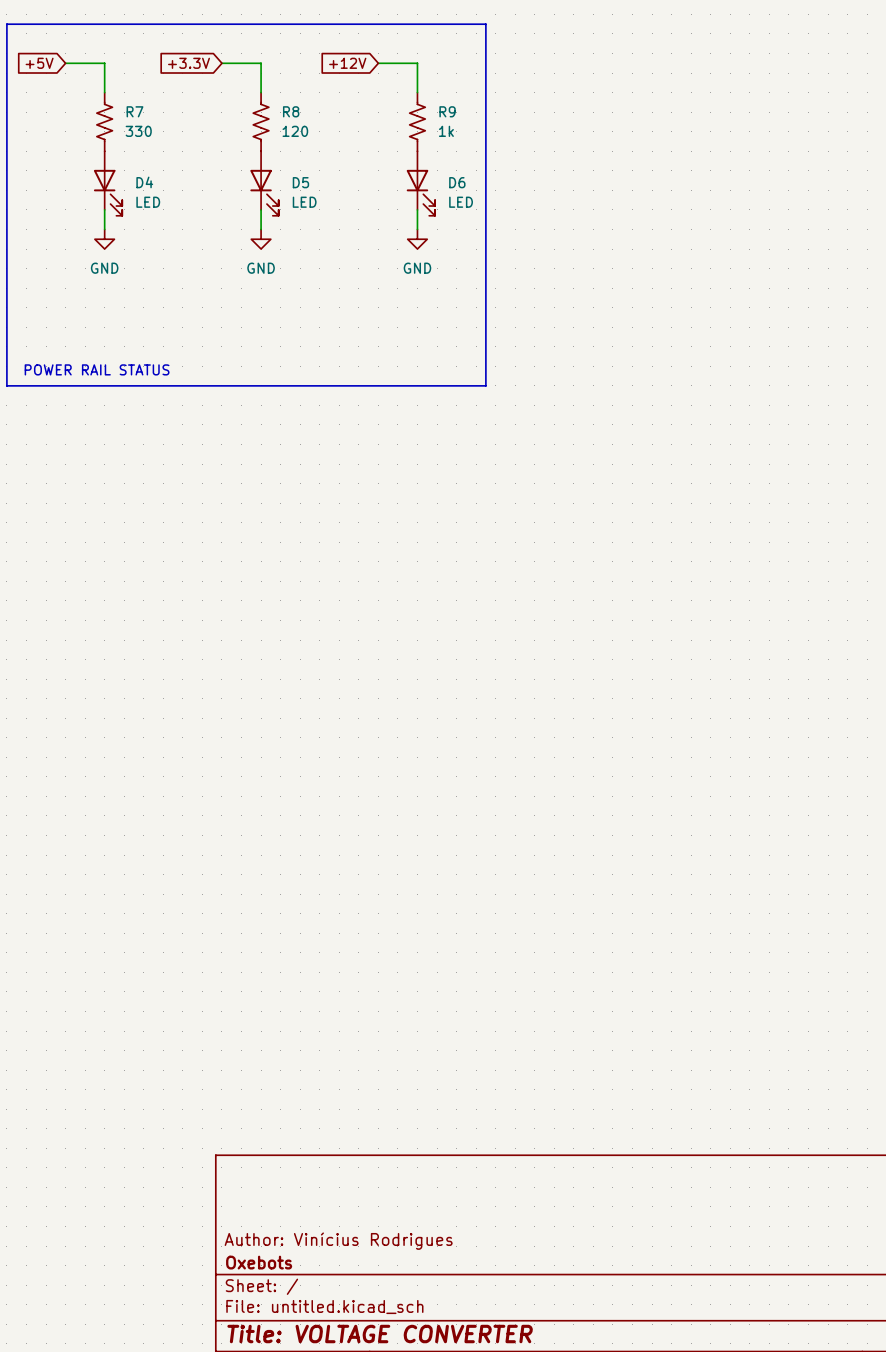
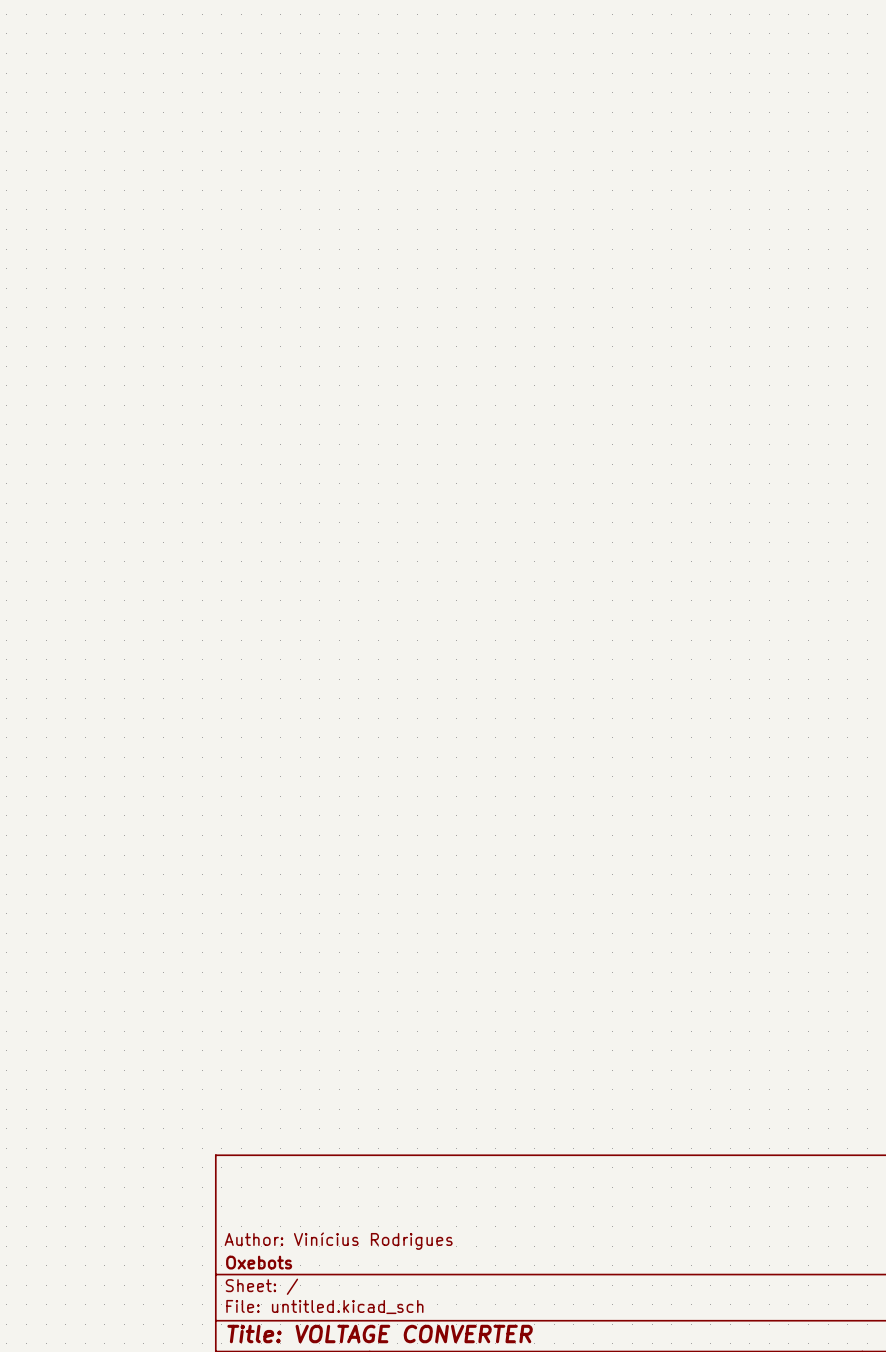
line: (6, 24) (485, 24) (485, 385) (6, 385) (6, 24) -> none
global label: +5V (39, 63) -> none
wire: (65, 63) (104, 63) (104, 92) -> none
global label: +3.3V (189, 63) -> none
wire: (221, 63) (261, 63) (261, 92) -> none
global label: +12V (347, 63) -> none
wire: (378, 63) (417, 63) (417, 92) -> none
R7: 330 (104, 121) -> none
R8: 120 (261, 121) -> none
R9: 1k (417, 121) -> none
D4: LED (108, 183) -> none
D5: LED (264, 183) -> none
D6: LED (420, 183) -> none
wire: (104, 209) (104, 229) -> none
wire: (261, 209) (261, 229) -> none
wire: (417, 209) (417, 229) -> none
power symbol: GND (104, 239) -> none
power symbol: GND (261, 239) -> none
power symbol: GND (417, 239) -> none
text: POWER RAIL STATUS (97, 369) -> none

